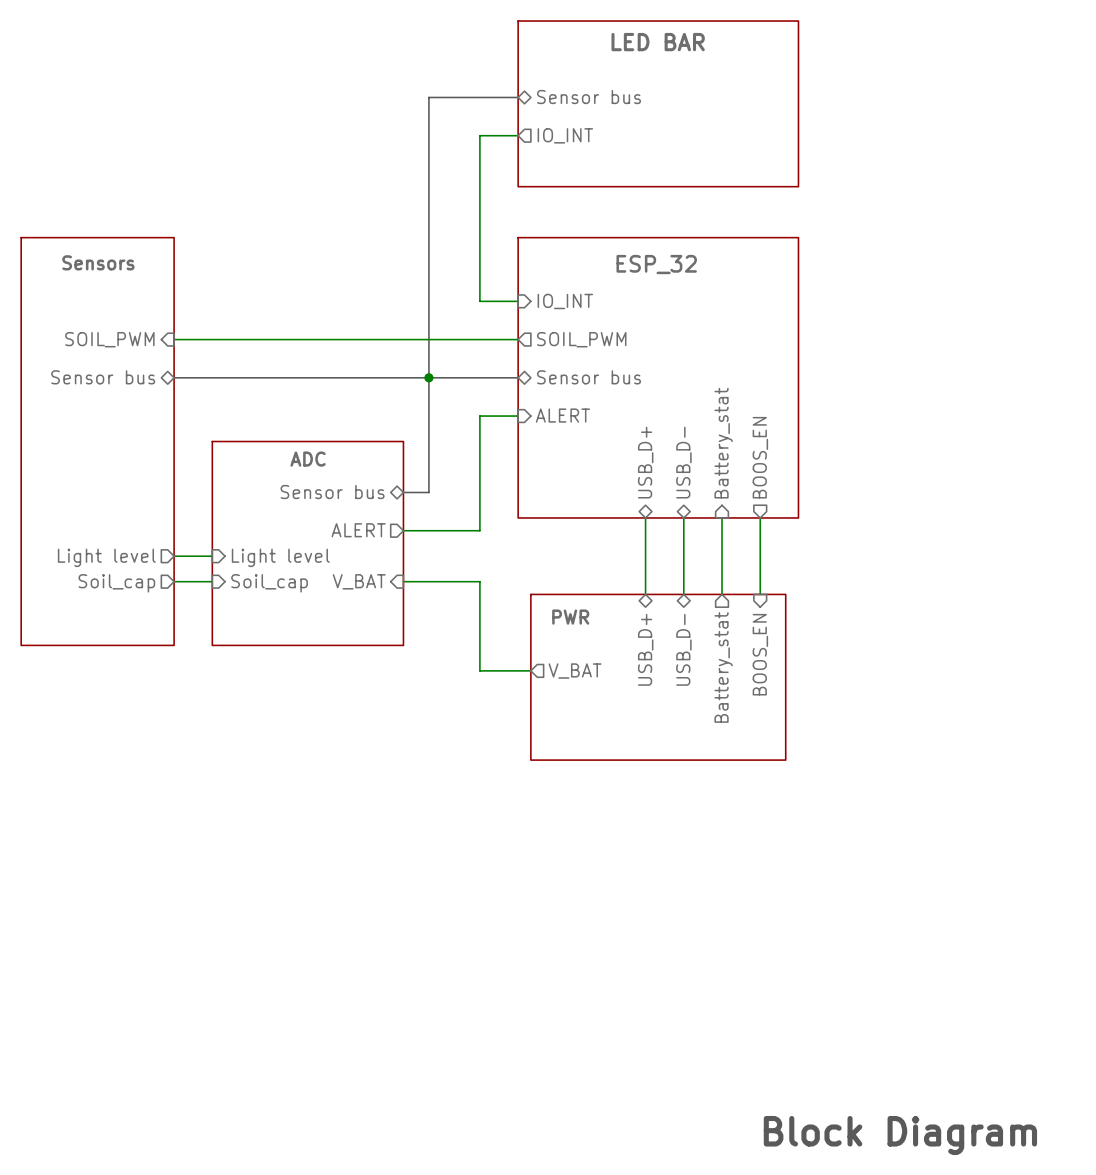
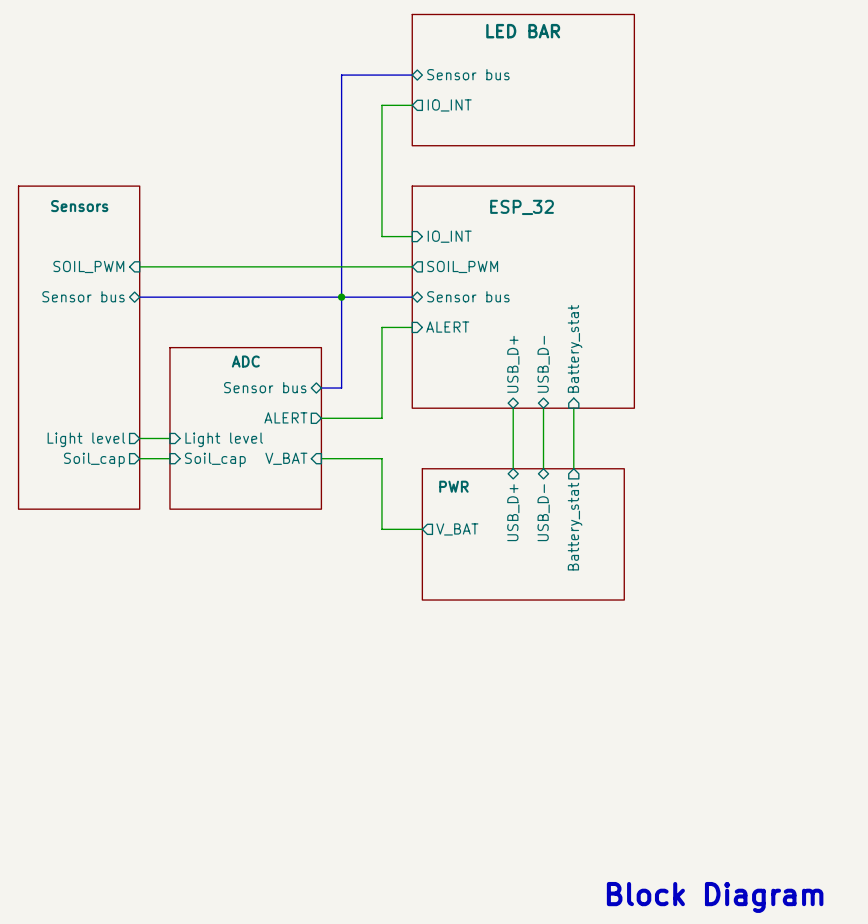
sheet pin: BOOS_EN (760, 457) -> none
wire: (760, 517) (760, 594) -> none
sheet pin: BOOS_EN (760, 654) -> none

